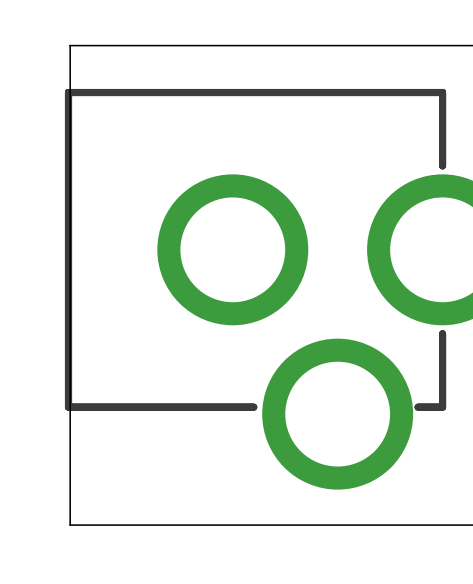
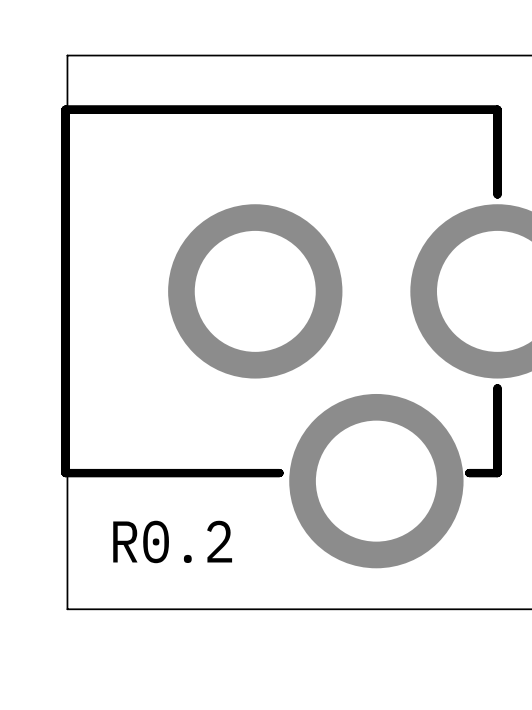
text: none -> R0.2 (172, 541)

